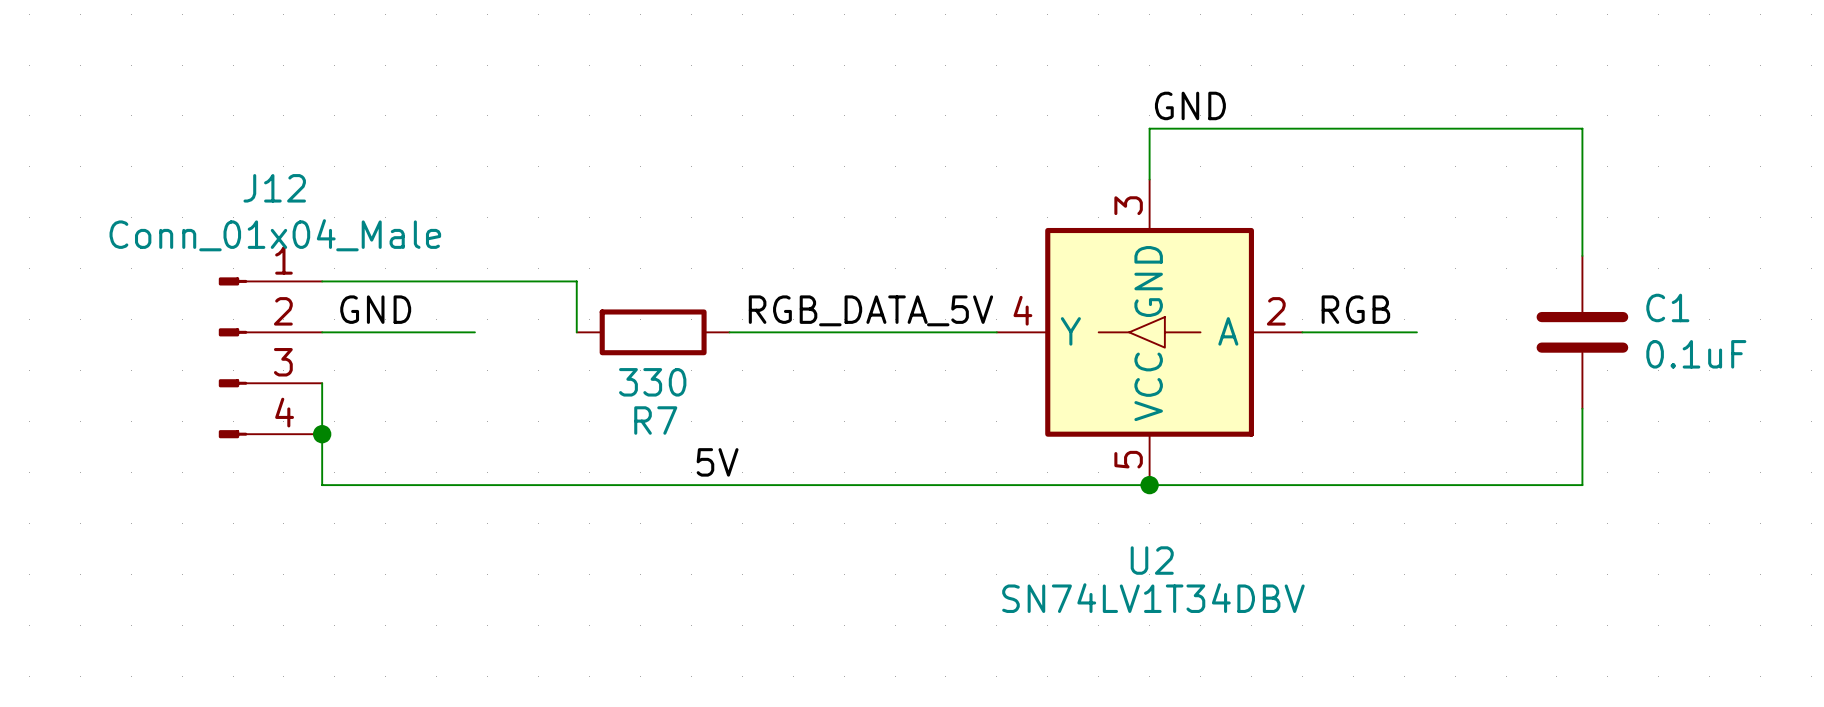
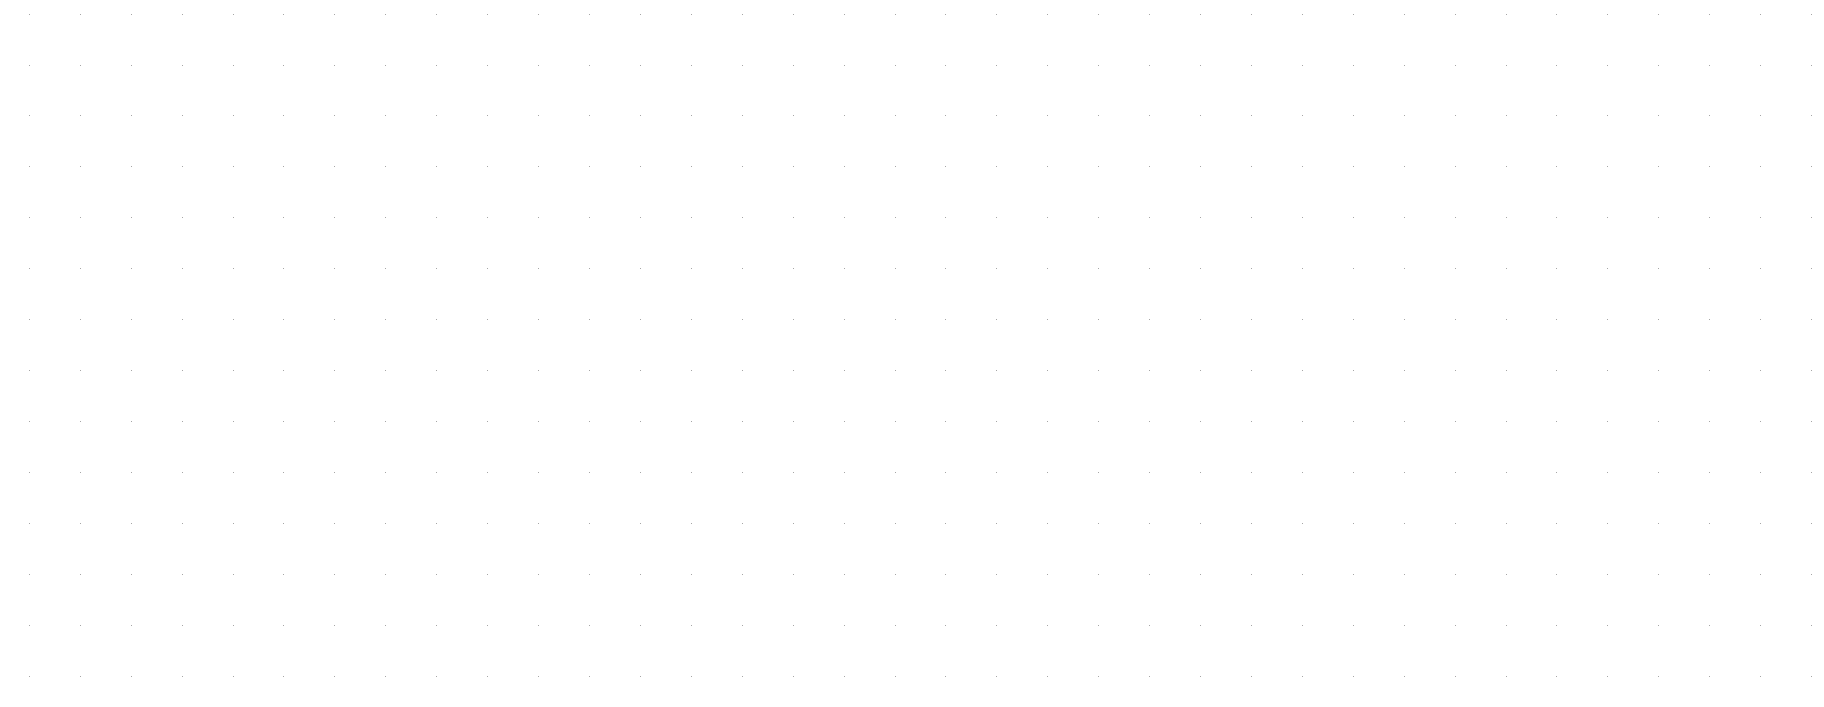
label: GND (1190, 105) -> none
wire: (1149, 179) (1149, 128) (1582, 128) (1582, 255) -> none
wire: (322, 281) (576, 281) (576, 332) -> none
label: GND (375, 309) -> none
label: RGB (1355, 309) -> none
label: RGB_DATA_5V (870, 310) -> none
wire: (322, 332) (474, 332) -> none
R7: 330 (653, 332) -> none
wire: (729, 332) (996, 332) -> none
U2: SN74LV1T34DBV (1149, 332) -> none
wire: (1302, 332) (1416, 332) -> none
C1: 0.1uF (1582, 332) -> none
J12: Conn_01x04_Male (270, 357) -> none
wire: (322, 383) (322, 485) (1582, 485) (1582, 408) -> none
junction: (322, 434) -> none
label: 5V (717, 462) -> none
junction: (1149, 485) -> none

